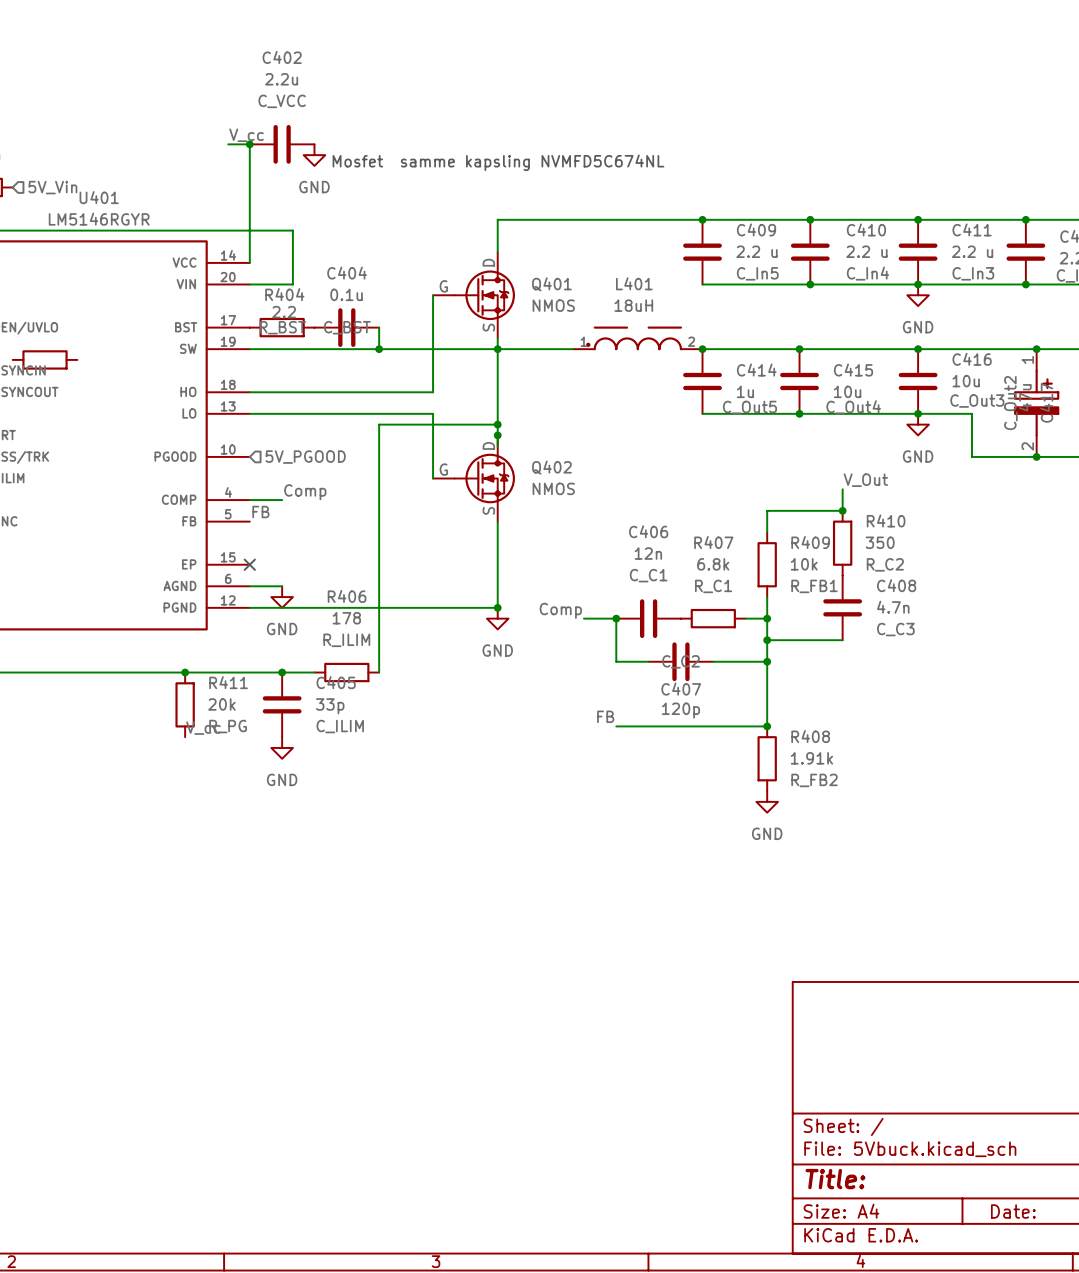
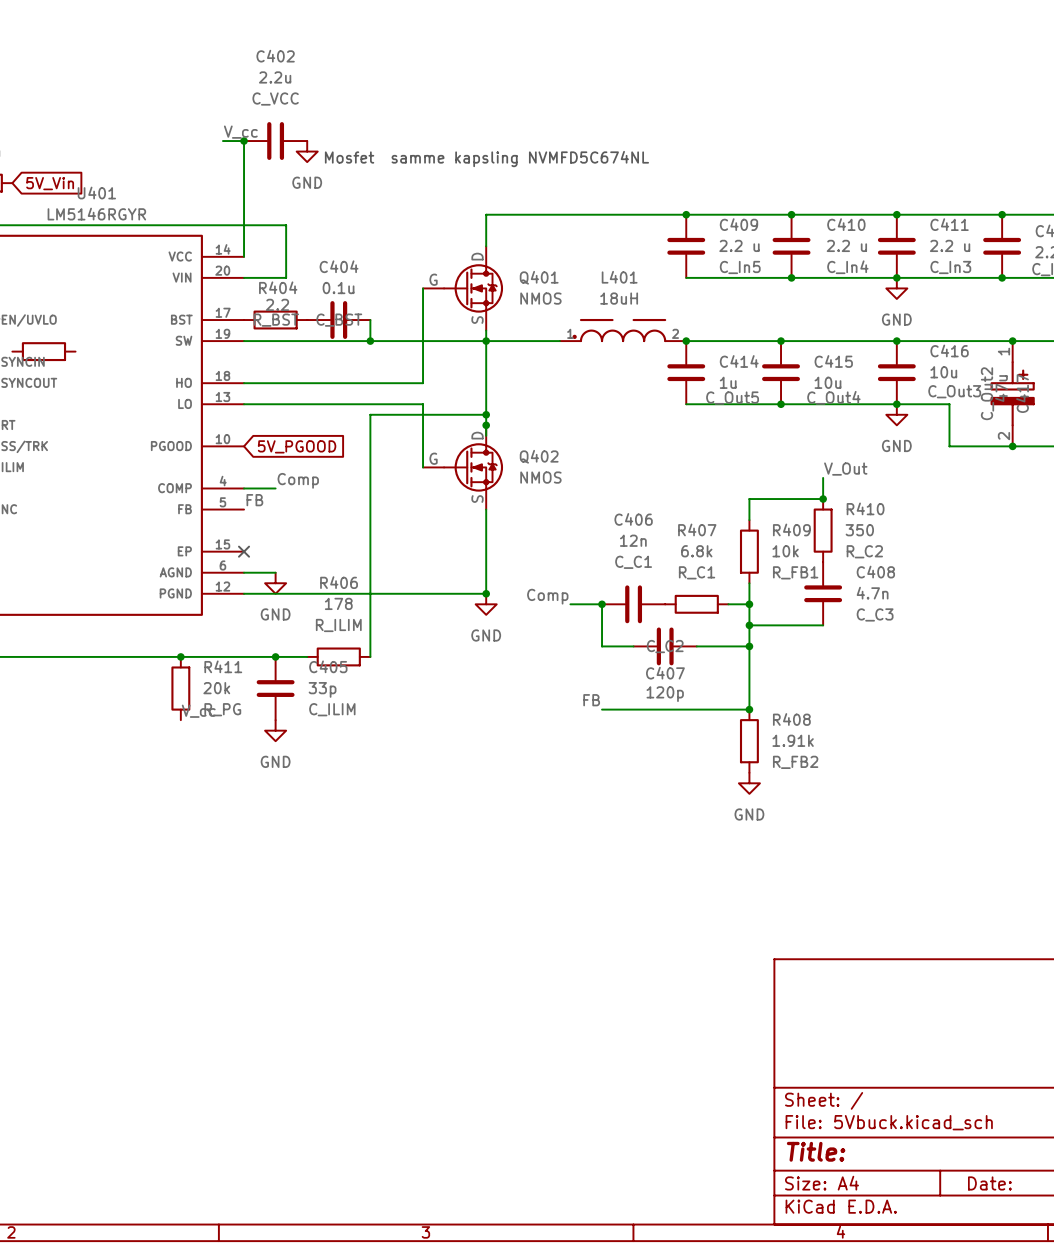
global label: none -> 5V_Vin (50, 183)
hierarchical label: 5V_Vin (52, 187) -> none
global label: none -> 5V_PGOOD (297, 446)
hierarchical label: 5V_PGOOD (305, 457) -> none

